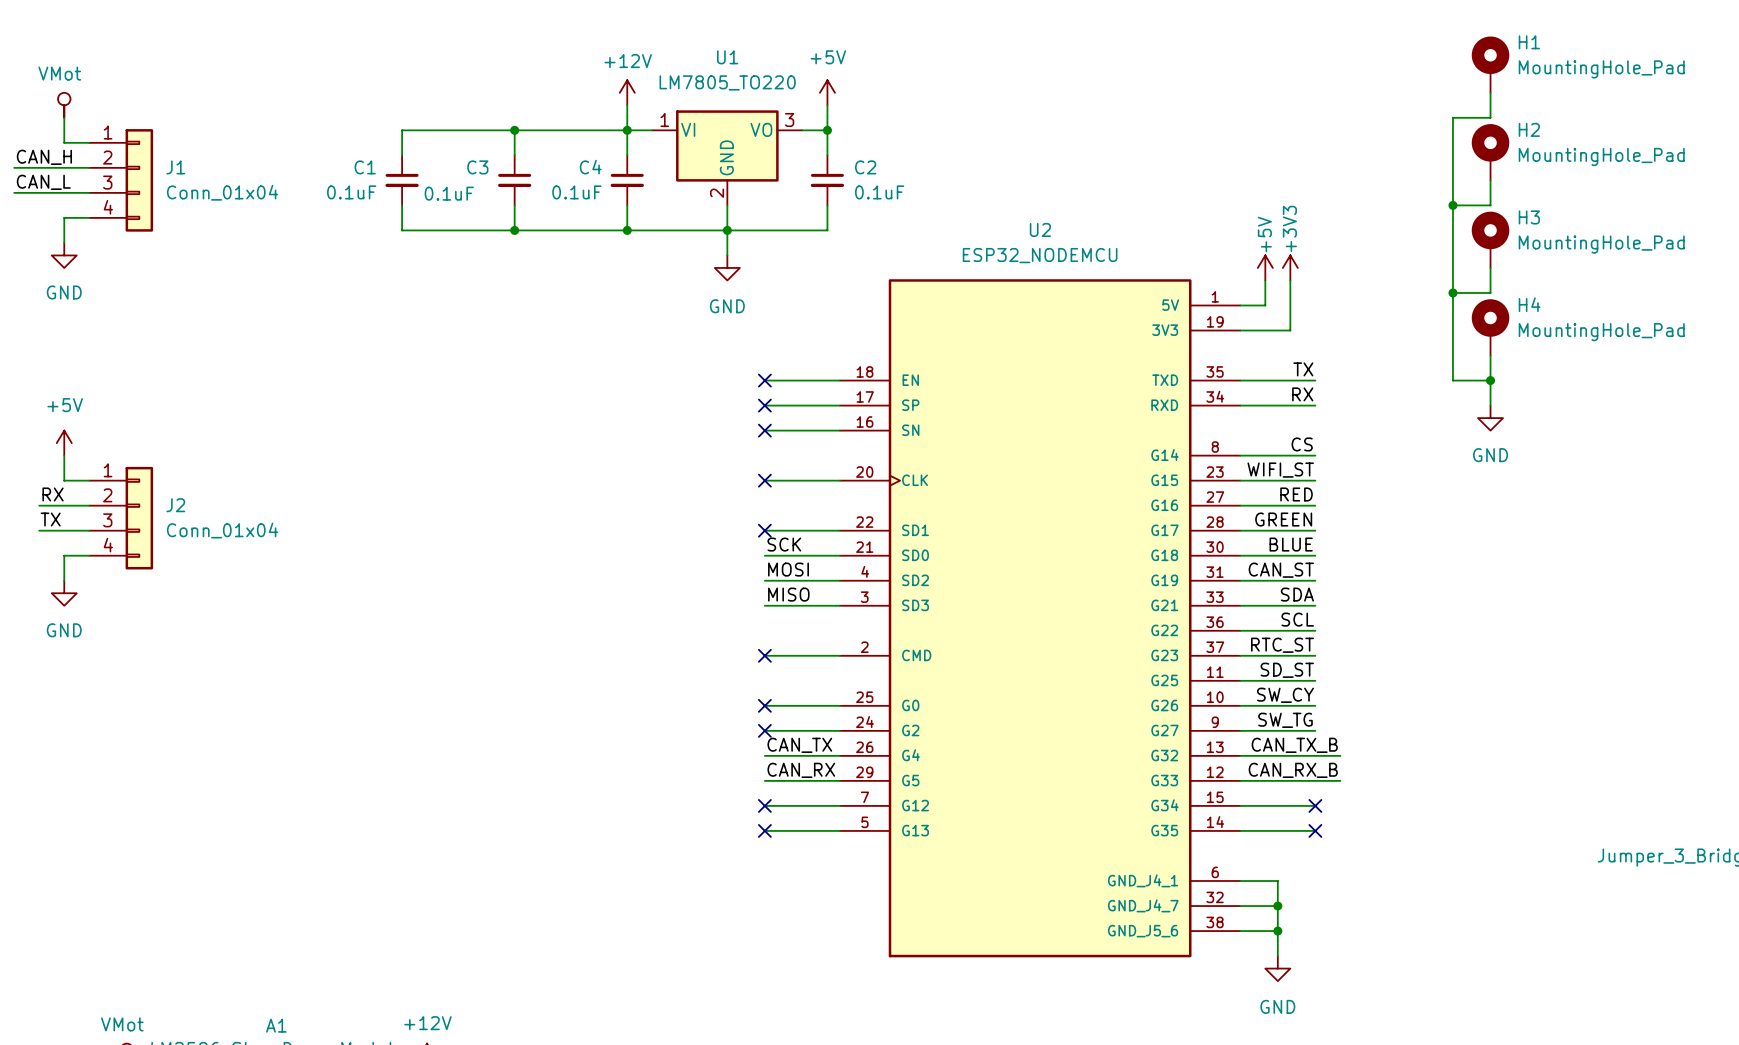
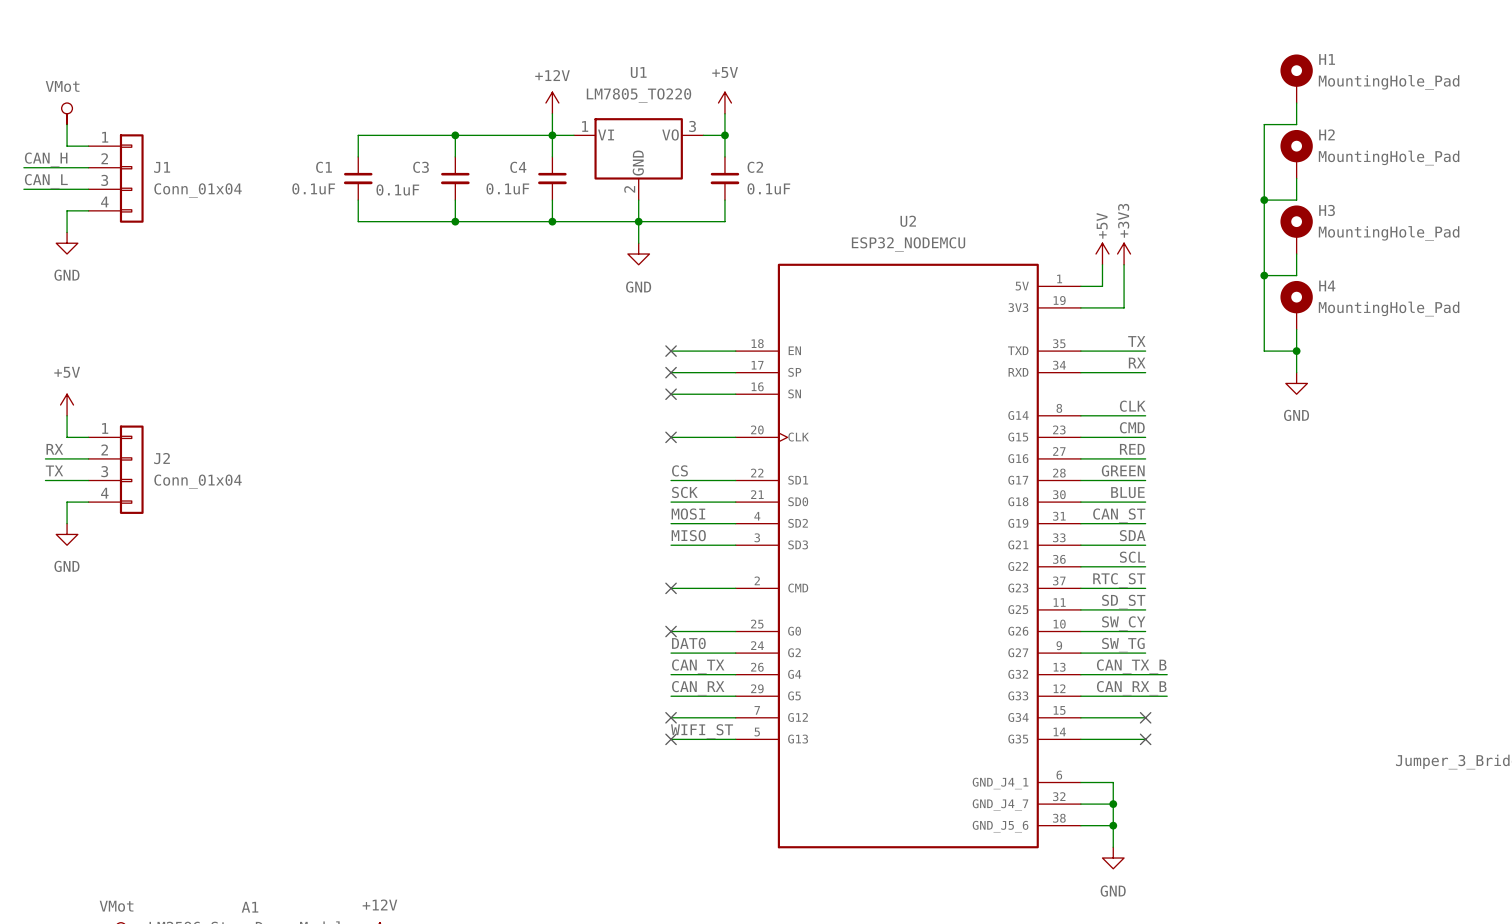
label: CS (1302, 444) -> CLK (1132, 406)
label: WIFI_ST (1280, 470) -> CMD (1132, 427)
label: none -> CS (679, 470)
no-connect mark: (764, 530) -> none
label: none -> DAT0 (688, 643)
no-connect mark: (764, 730) -> none
label: none -> WIFI_ST (702, 731)

